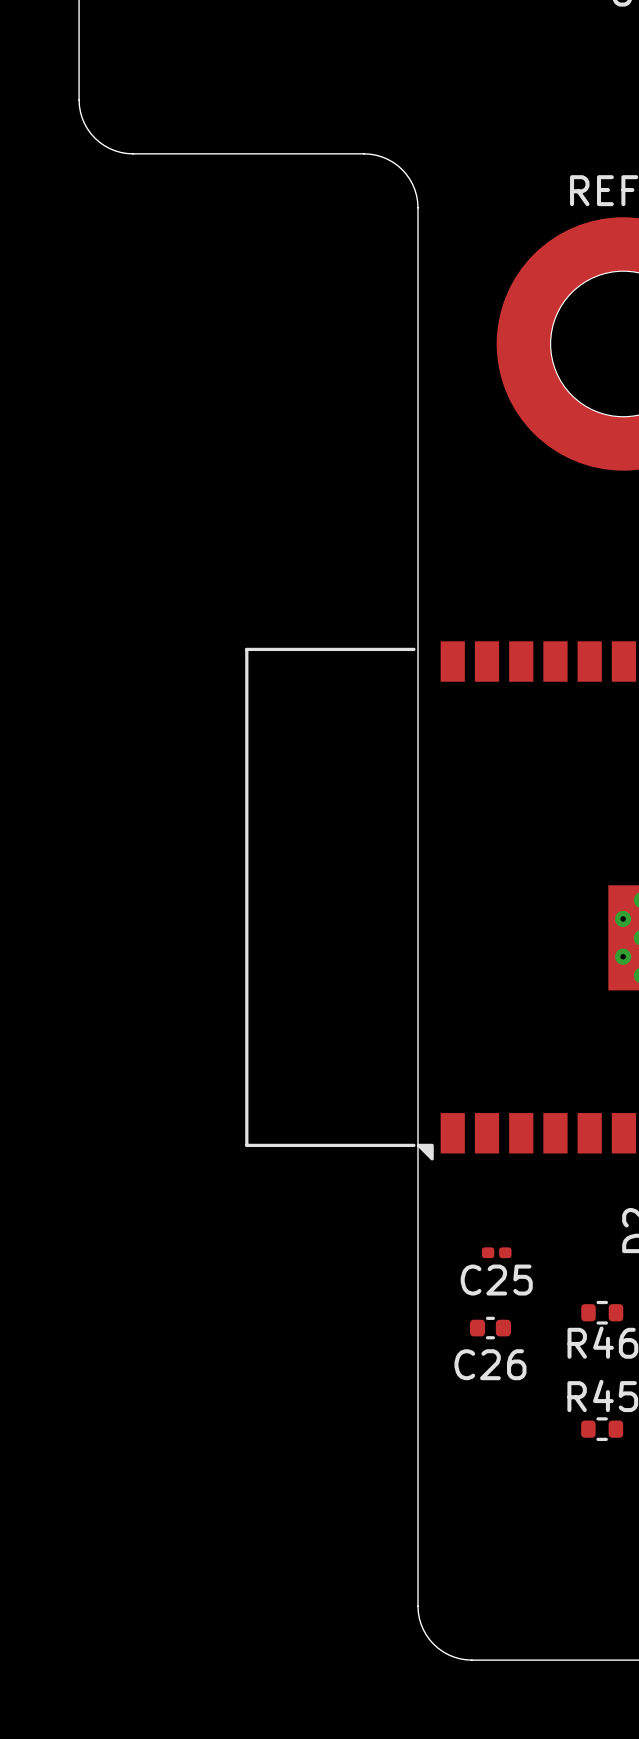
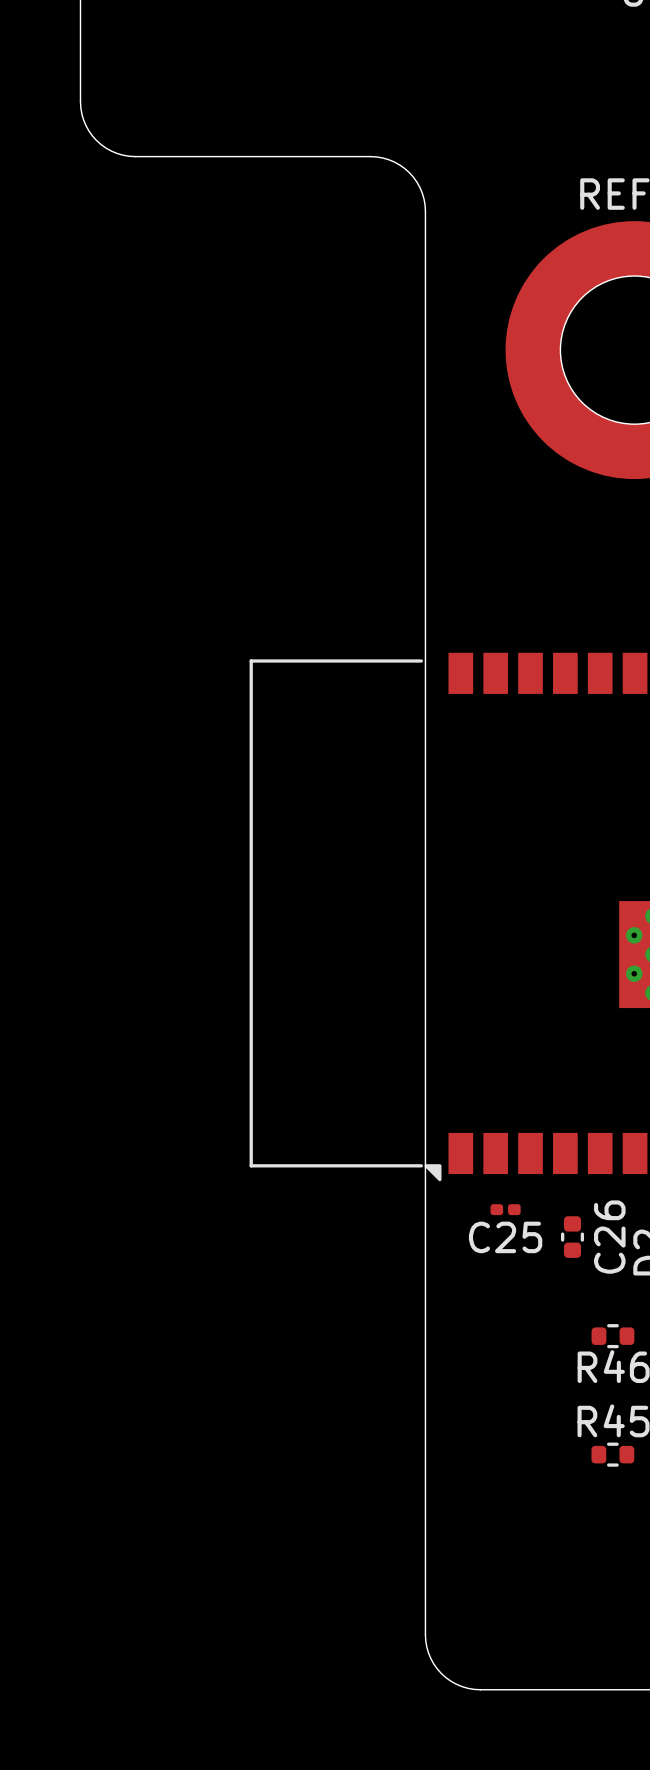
C25 position: (496, 1252) -> (505, 1209)
C26 rotation: 0° (490, 1328) -> 90° clockwise (572, 1237)
C26 position: (490, 1328) -> (572, 1237)

